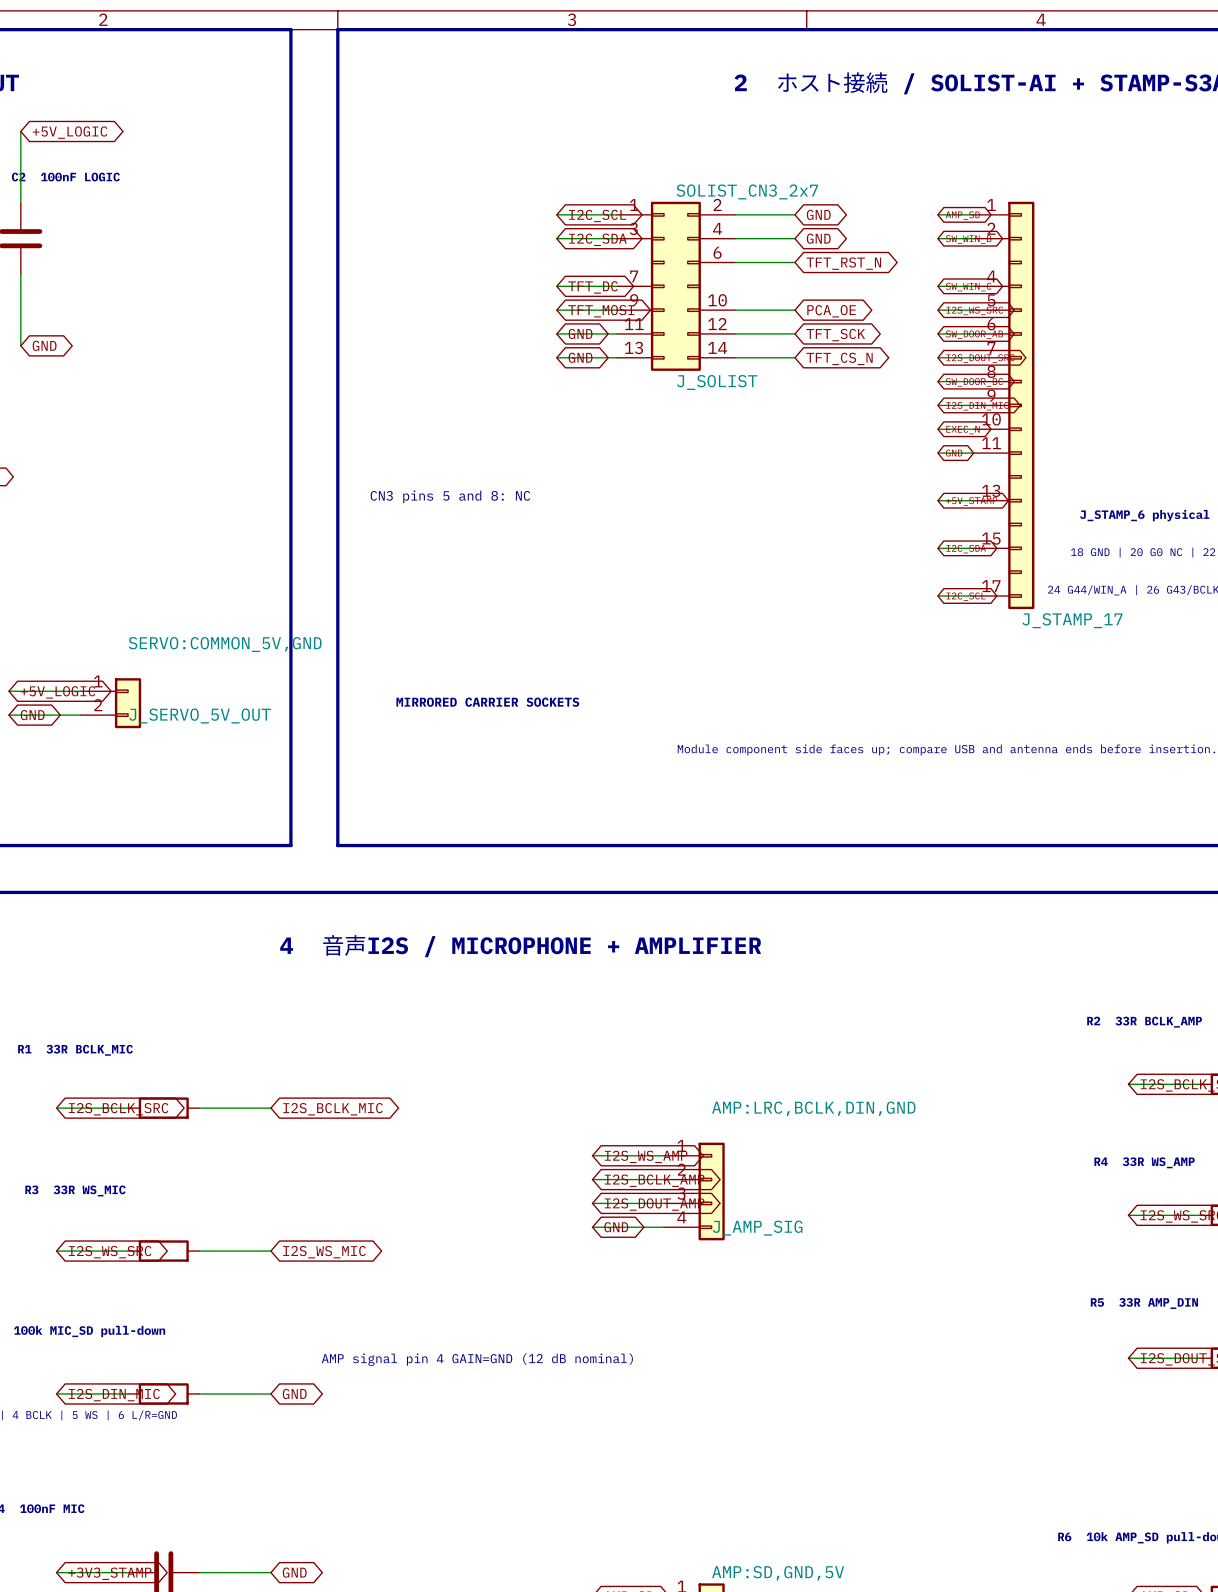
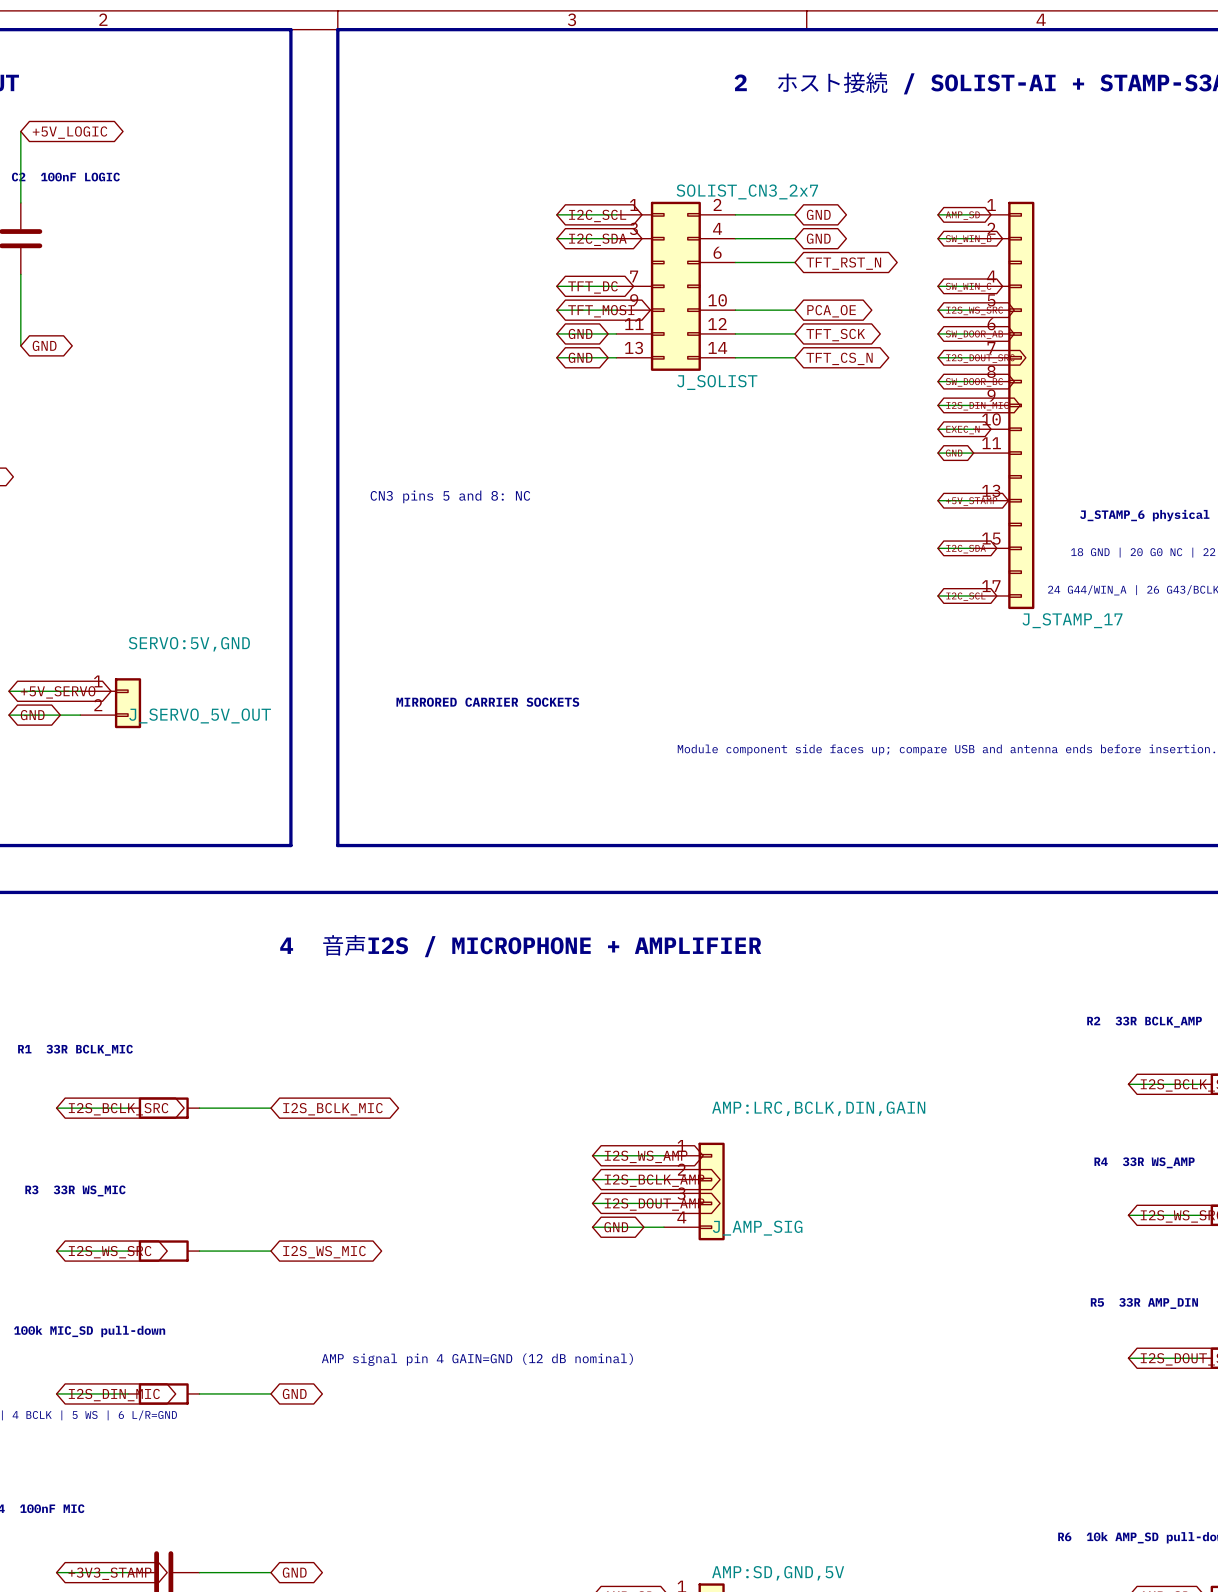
J_SERVO_5V_OUT value: SERVO:COMMON_5V,GND (225, 644) -> SERVO:5V,GND (189, 644)
global label: +5V_LOGIC (58, 692) -> +5V_SERVO (58, 692)
J_AMP_SIG value: AMP:LRC,BCLK,DIN,GND (813, 1108) -> AMP:LRC,BCLK,DIN,GAIN (818, 1108)

